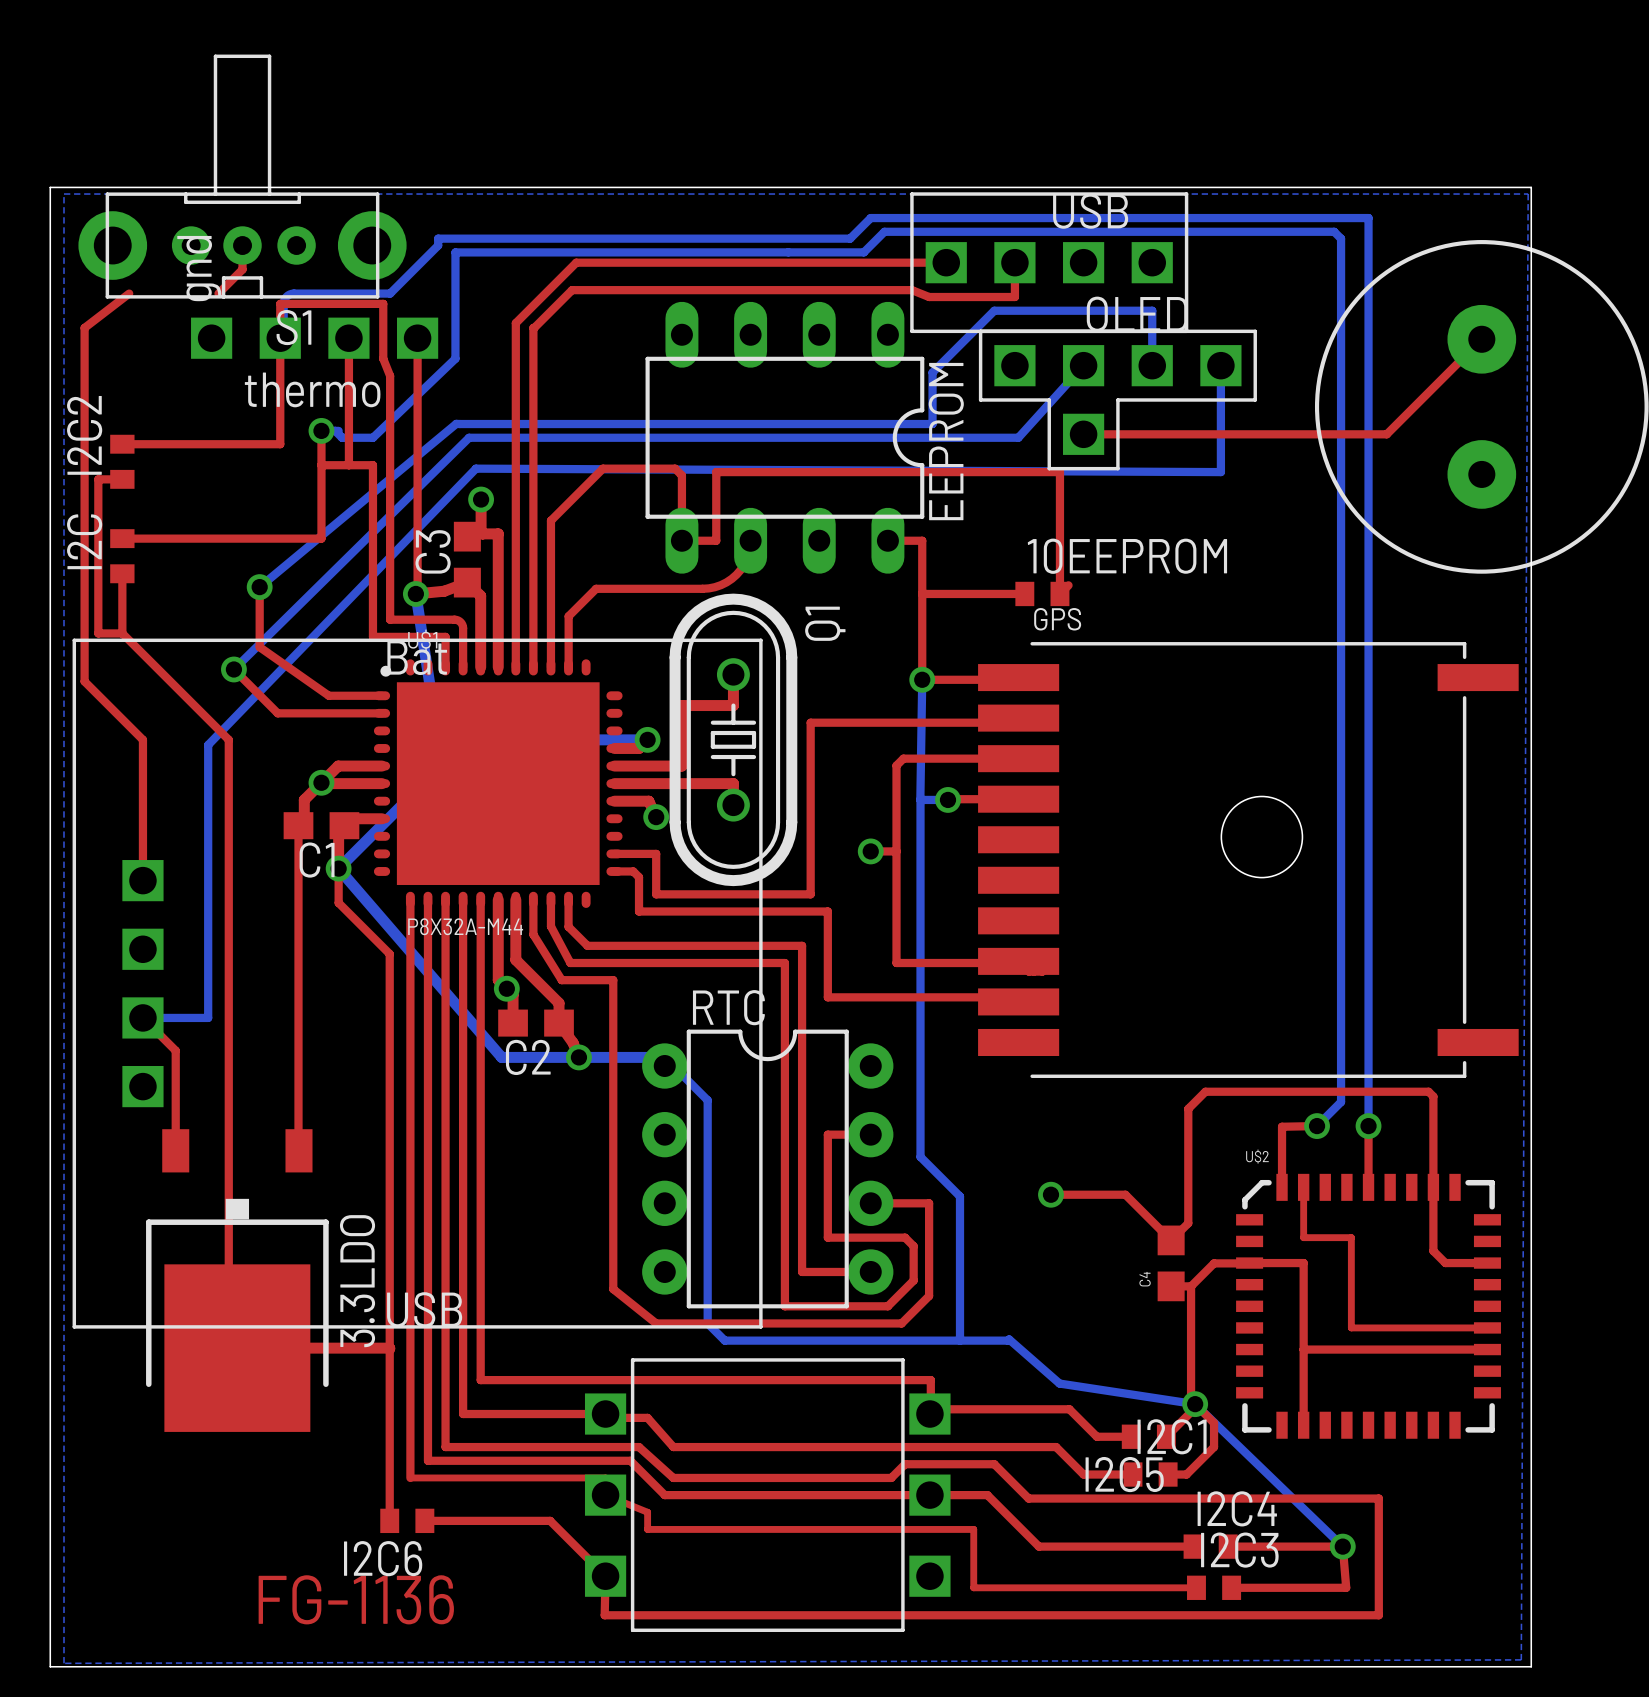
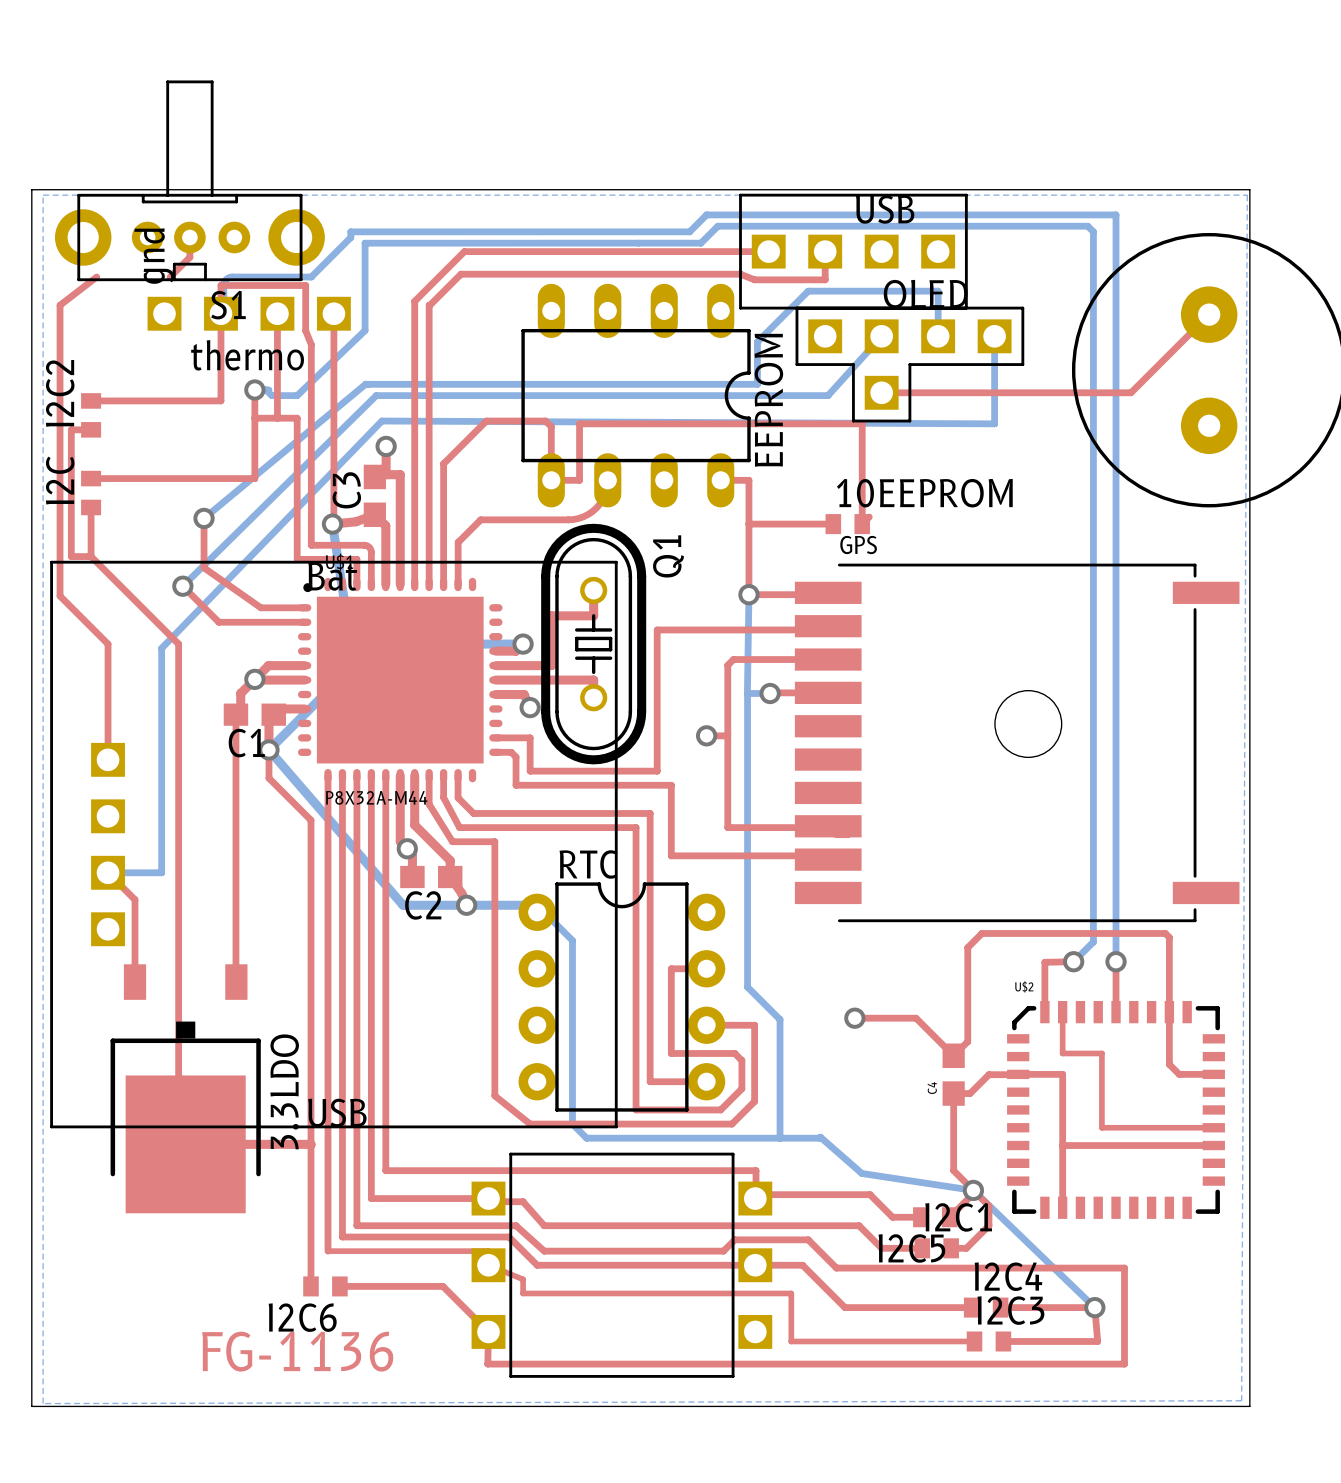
top track: (1191, 1286) (1191, 1400) -> (953, 1093) (953, 1170) (970, 1187)

